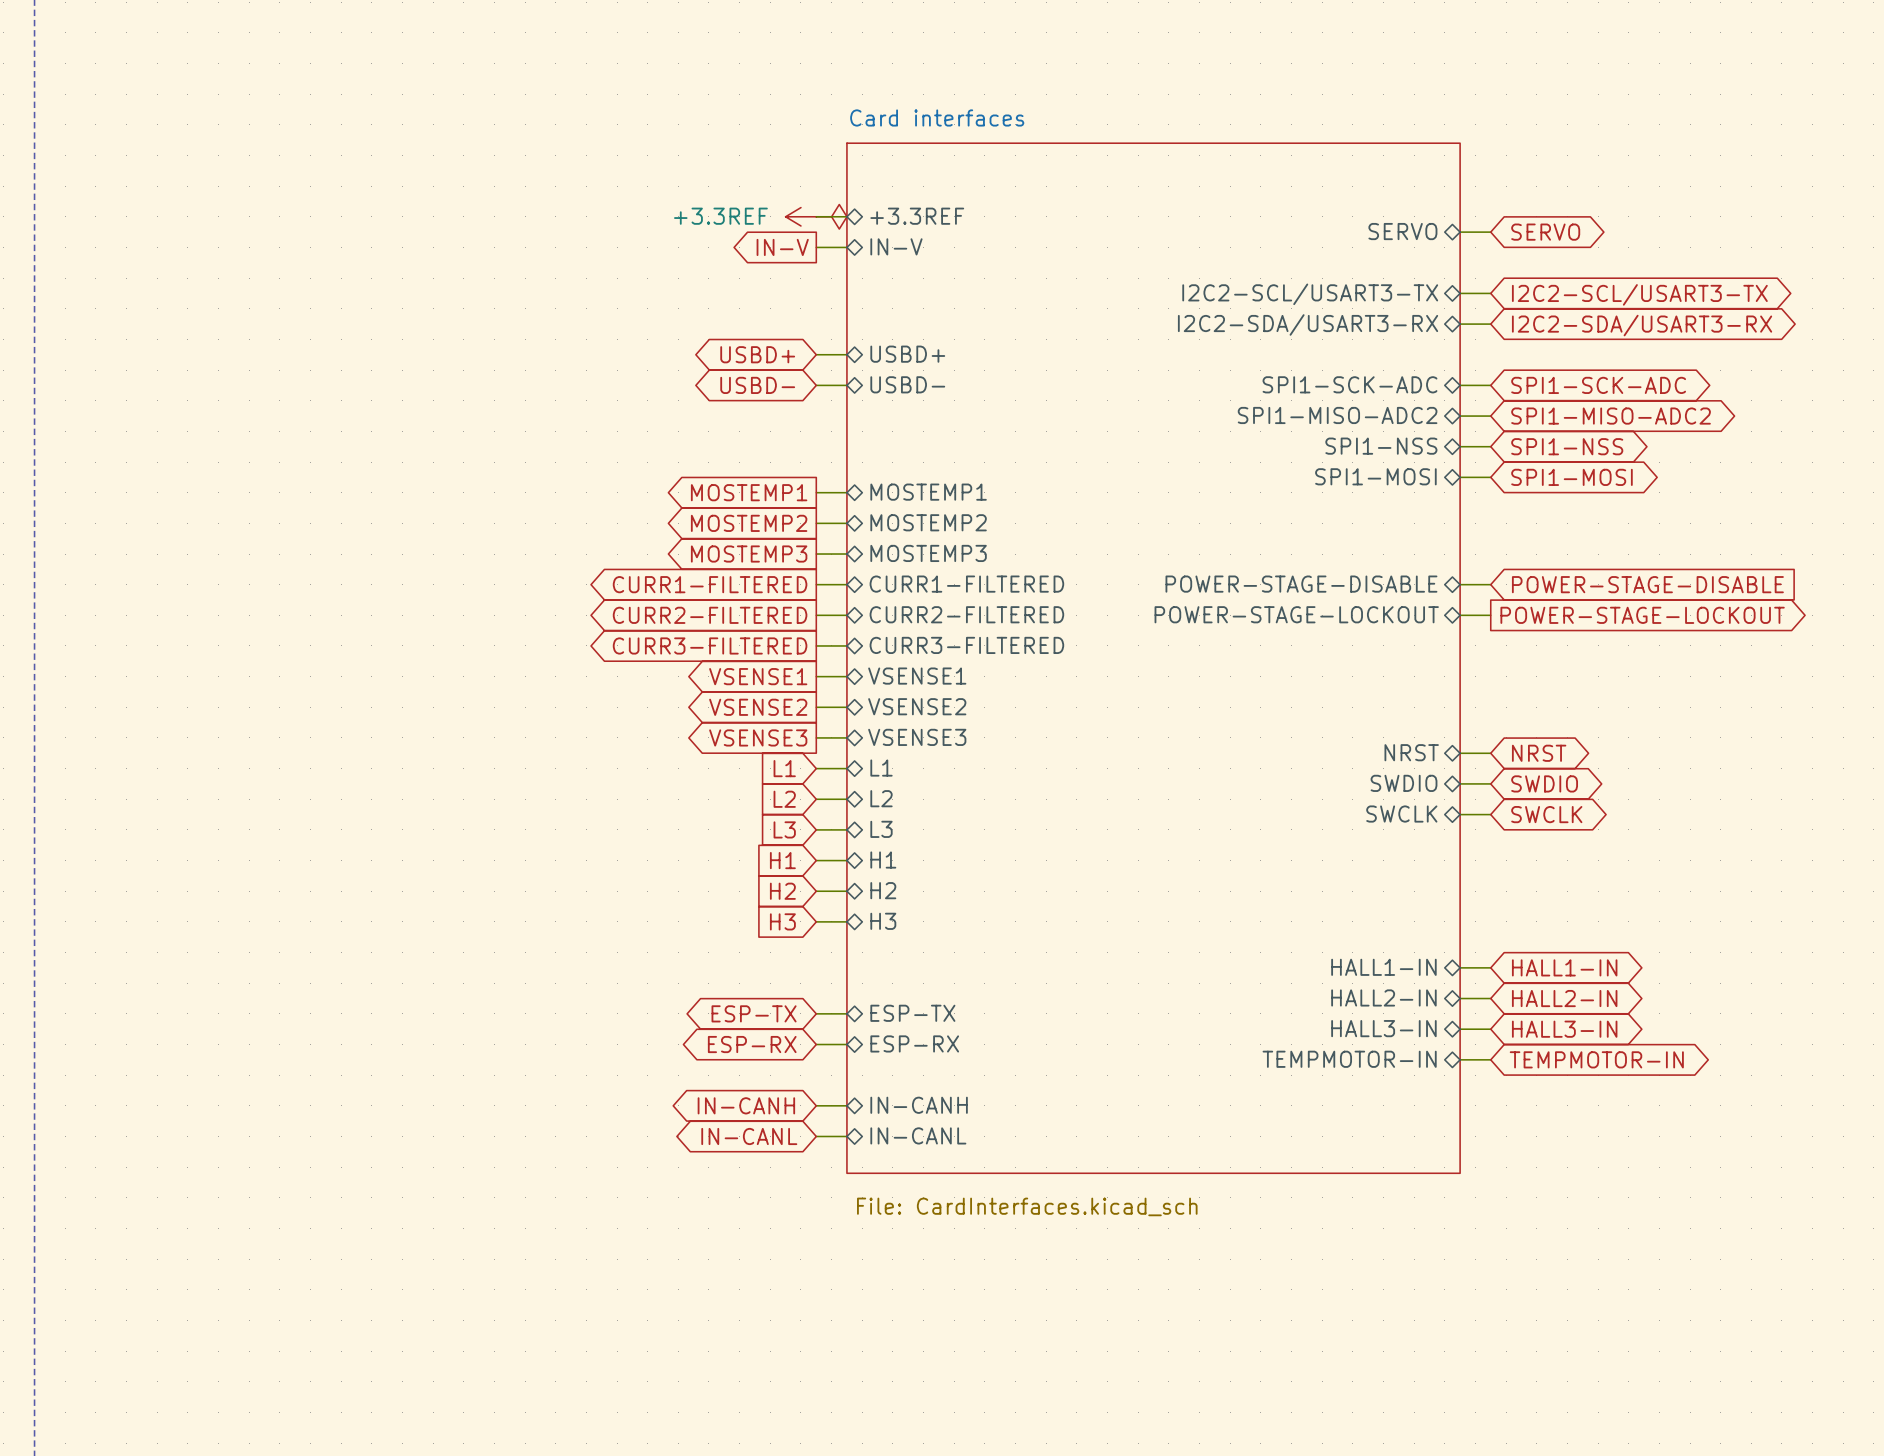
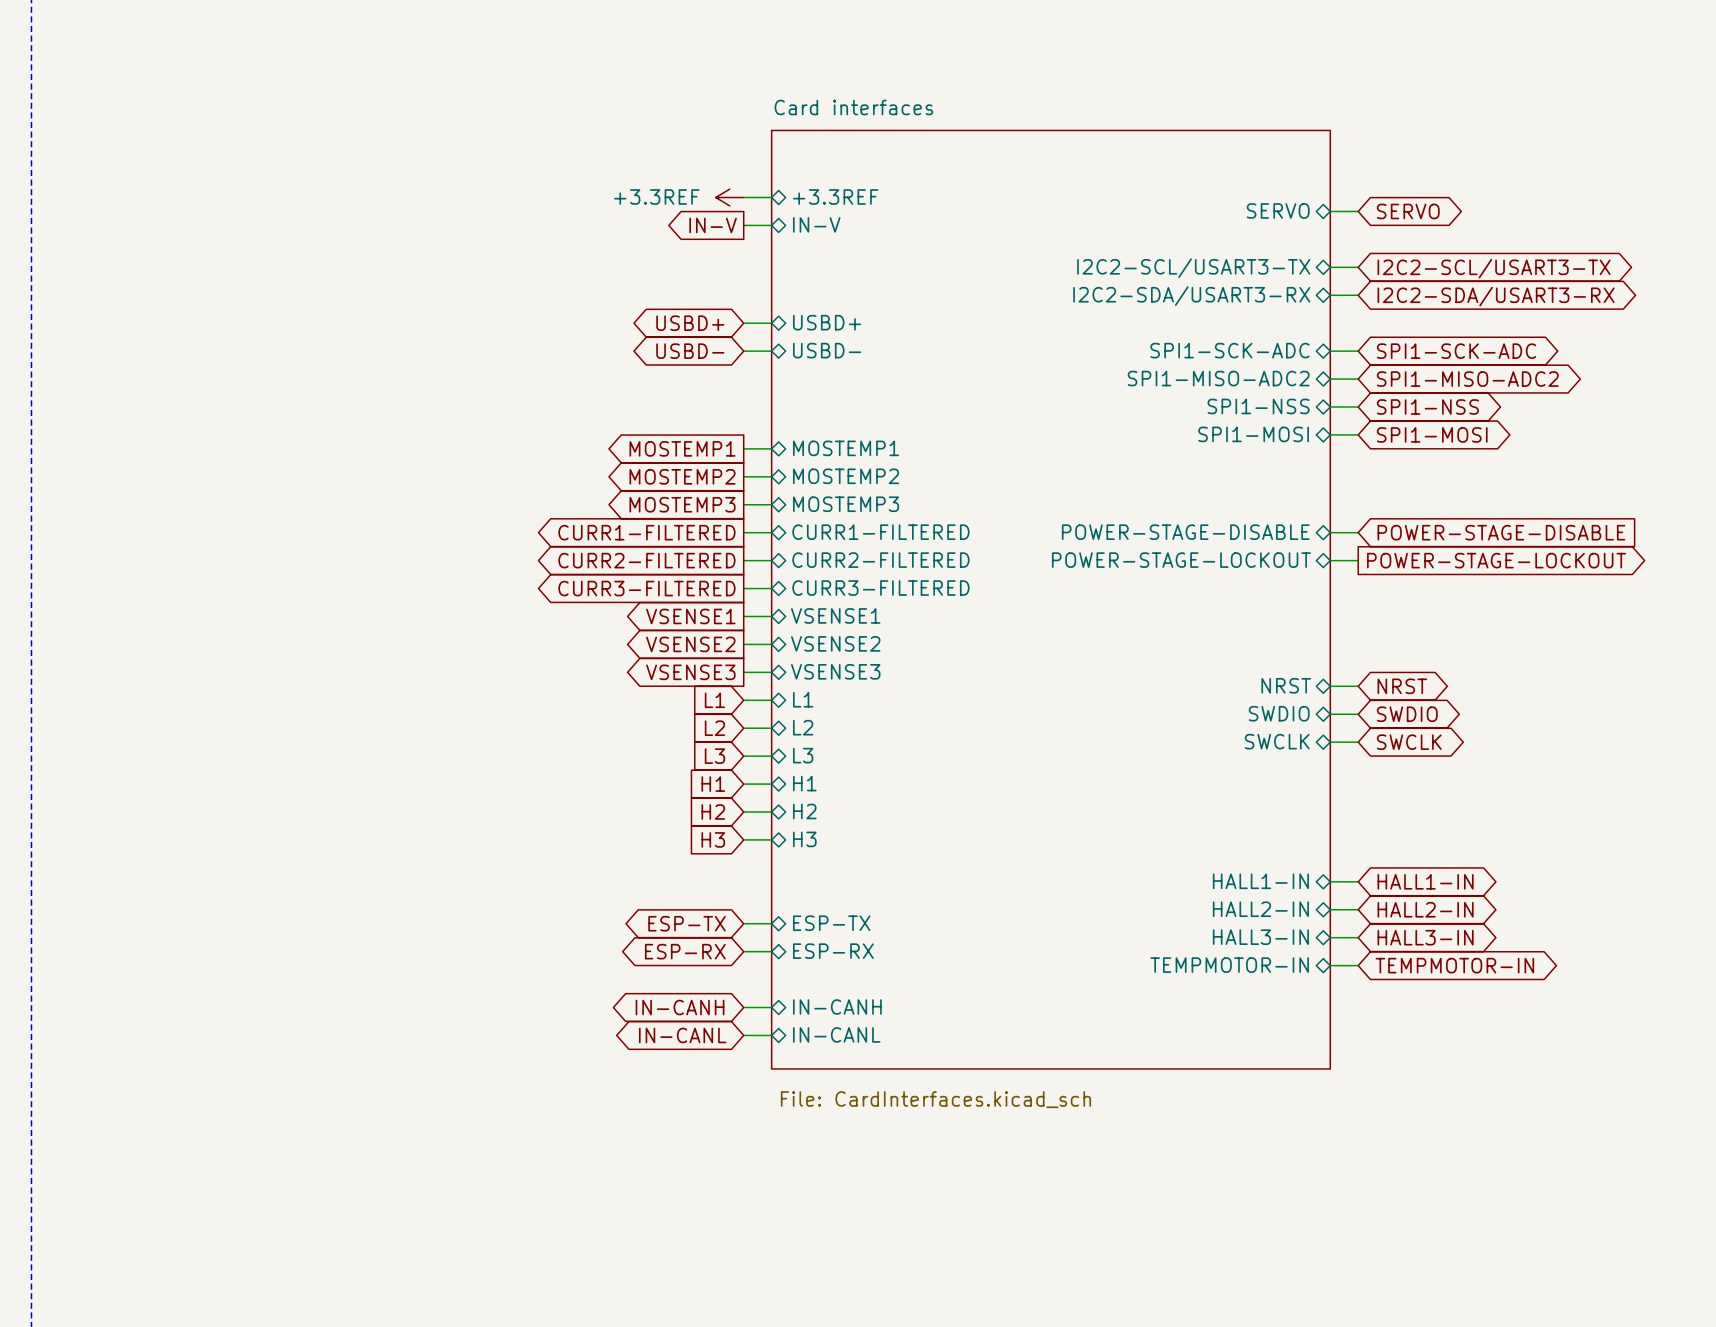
power symbol: (831, 216) -> none

